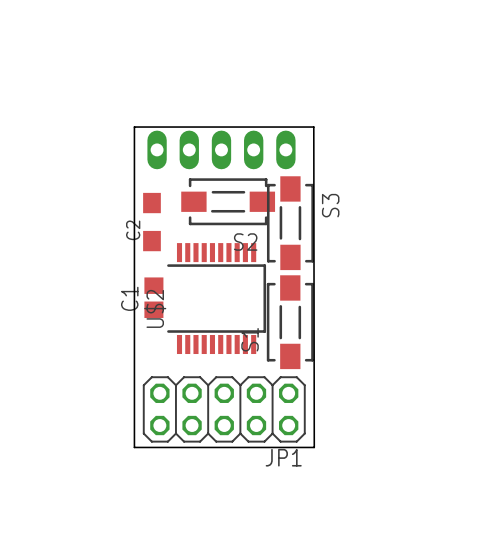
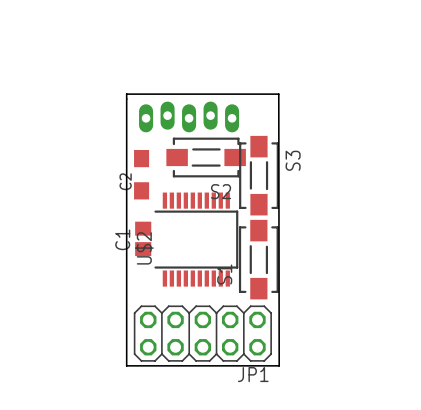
part: (221, 149) -> none
part: none -> (189, 116)

